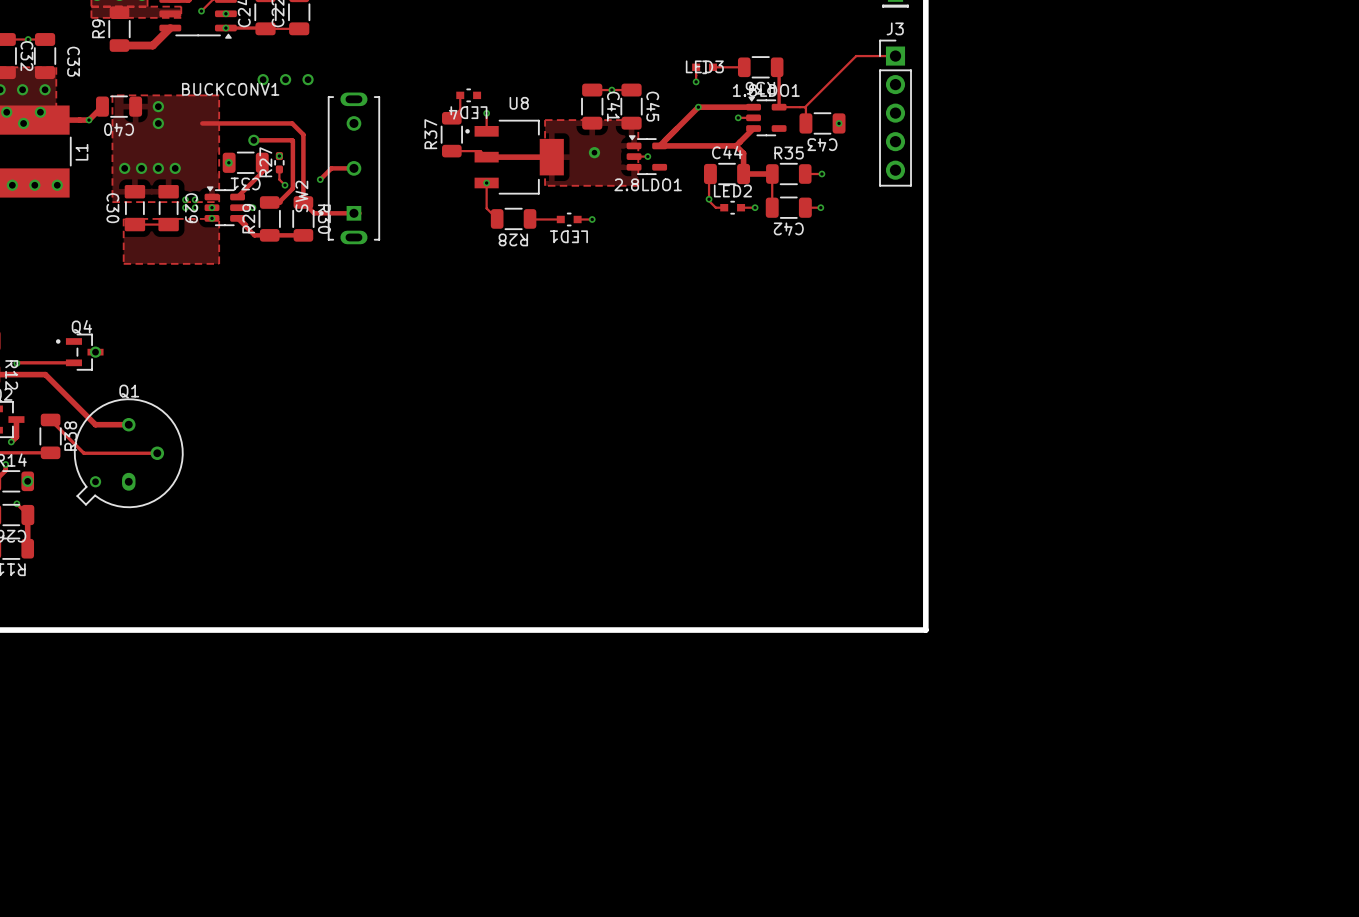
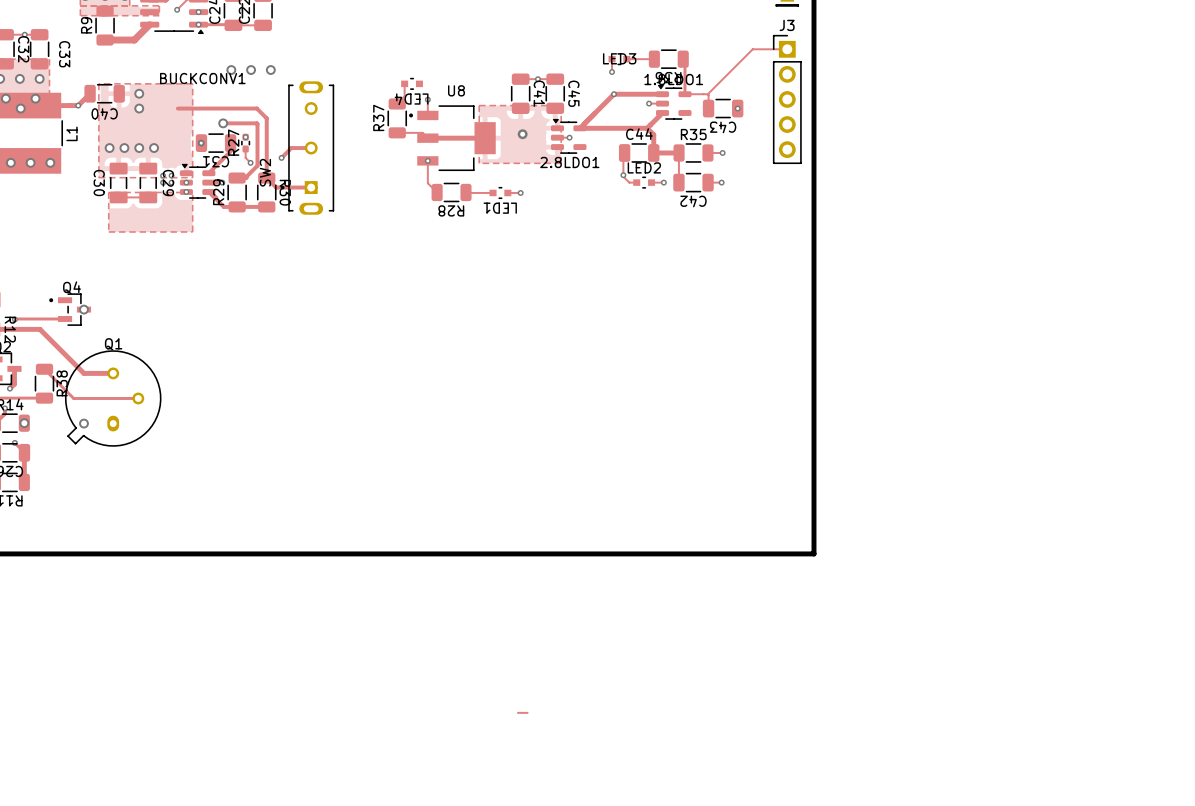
track: none -> (517, 712) (527, 712)

